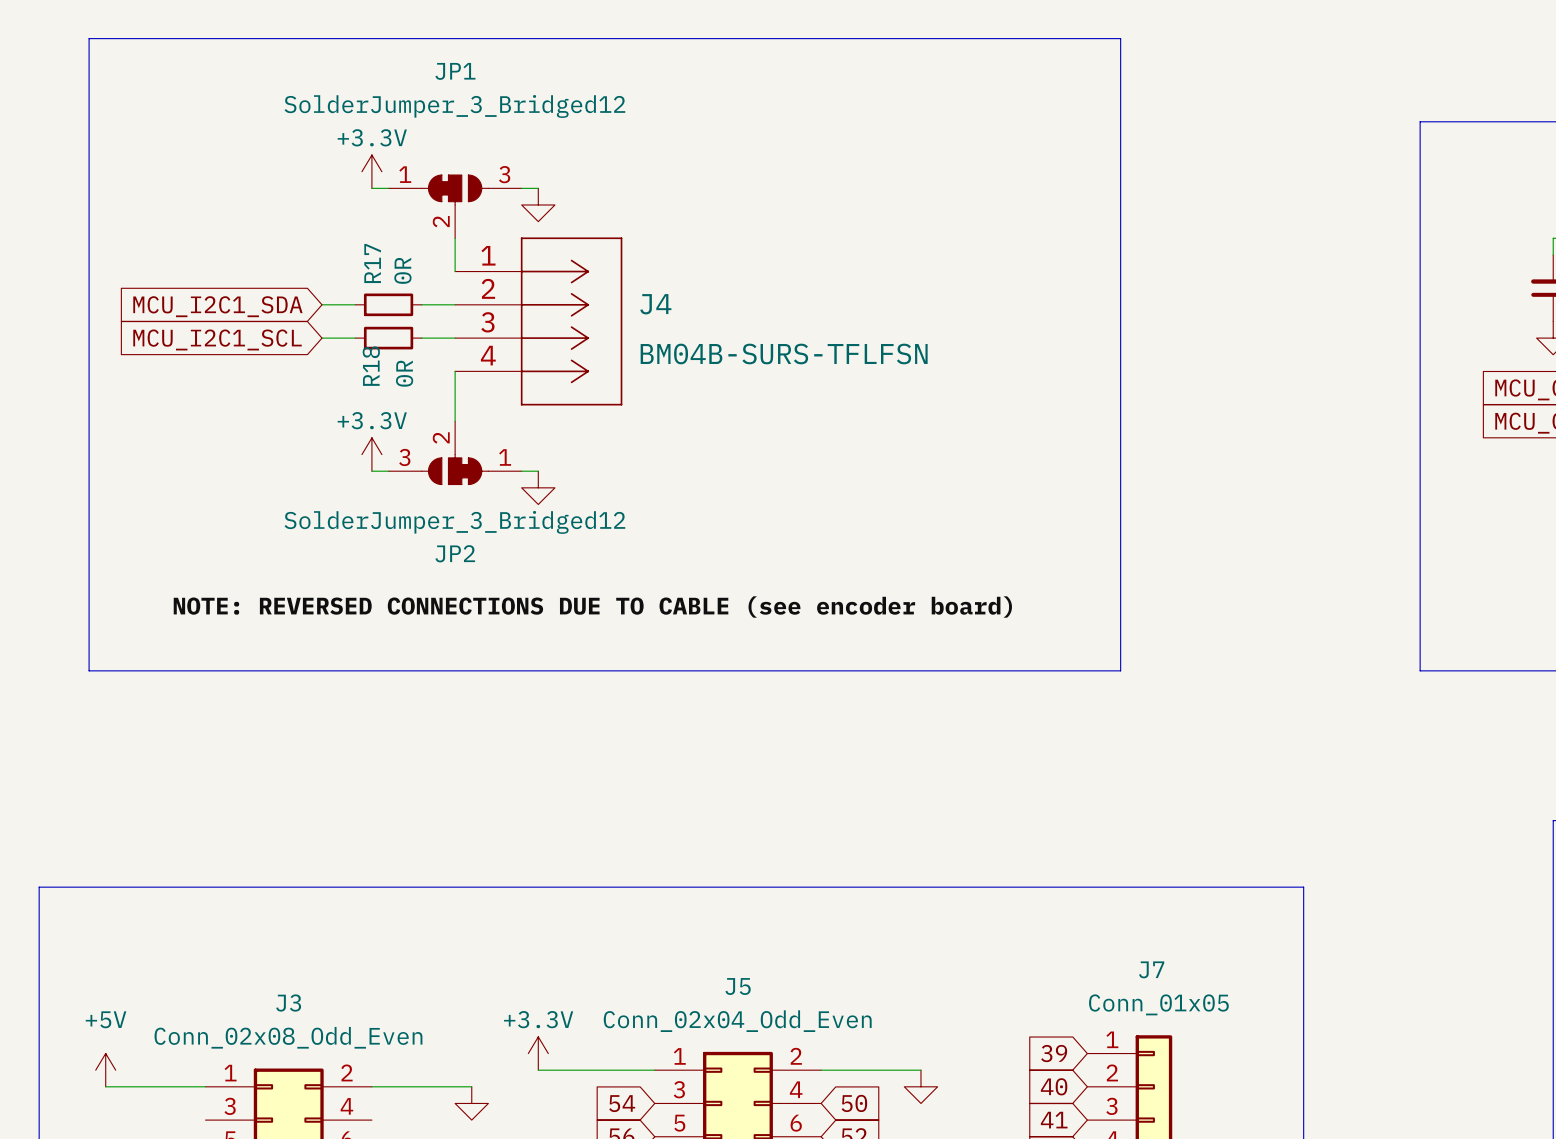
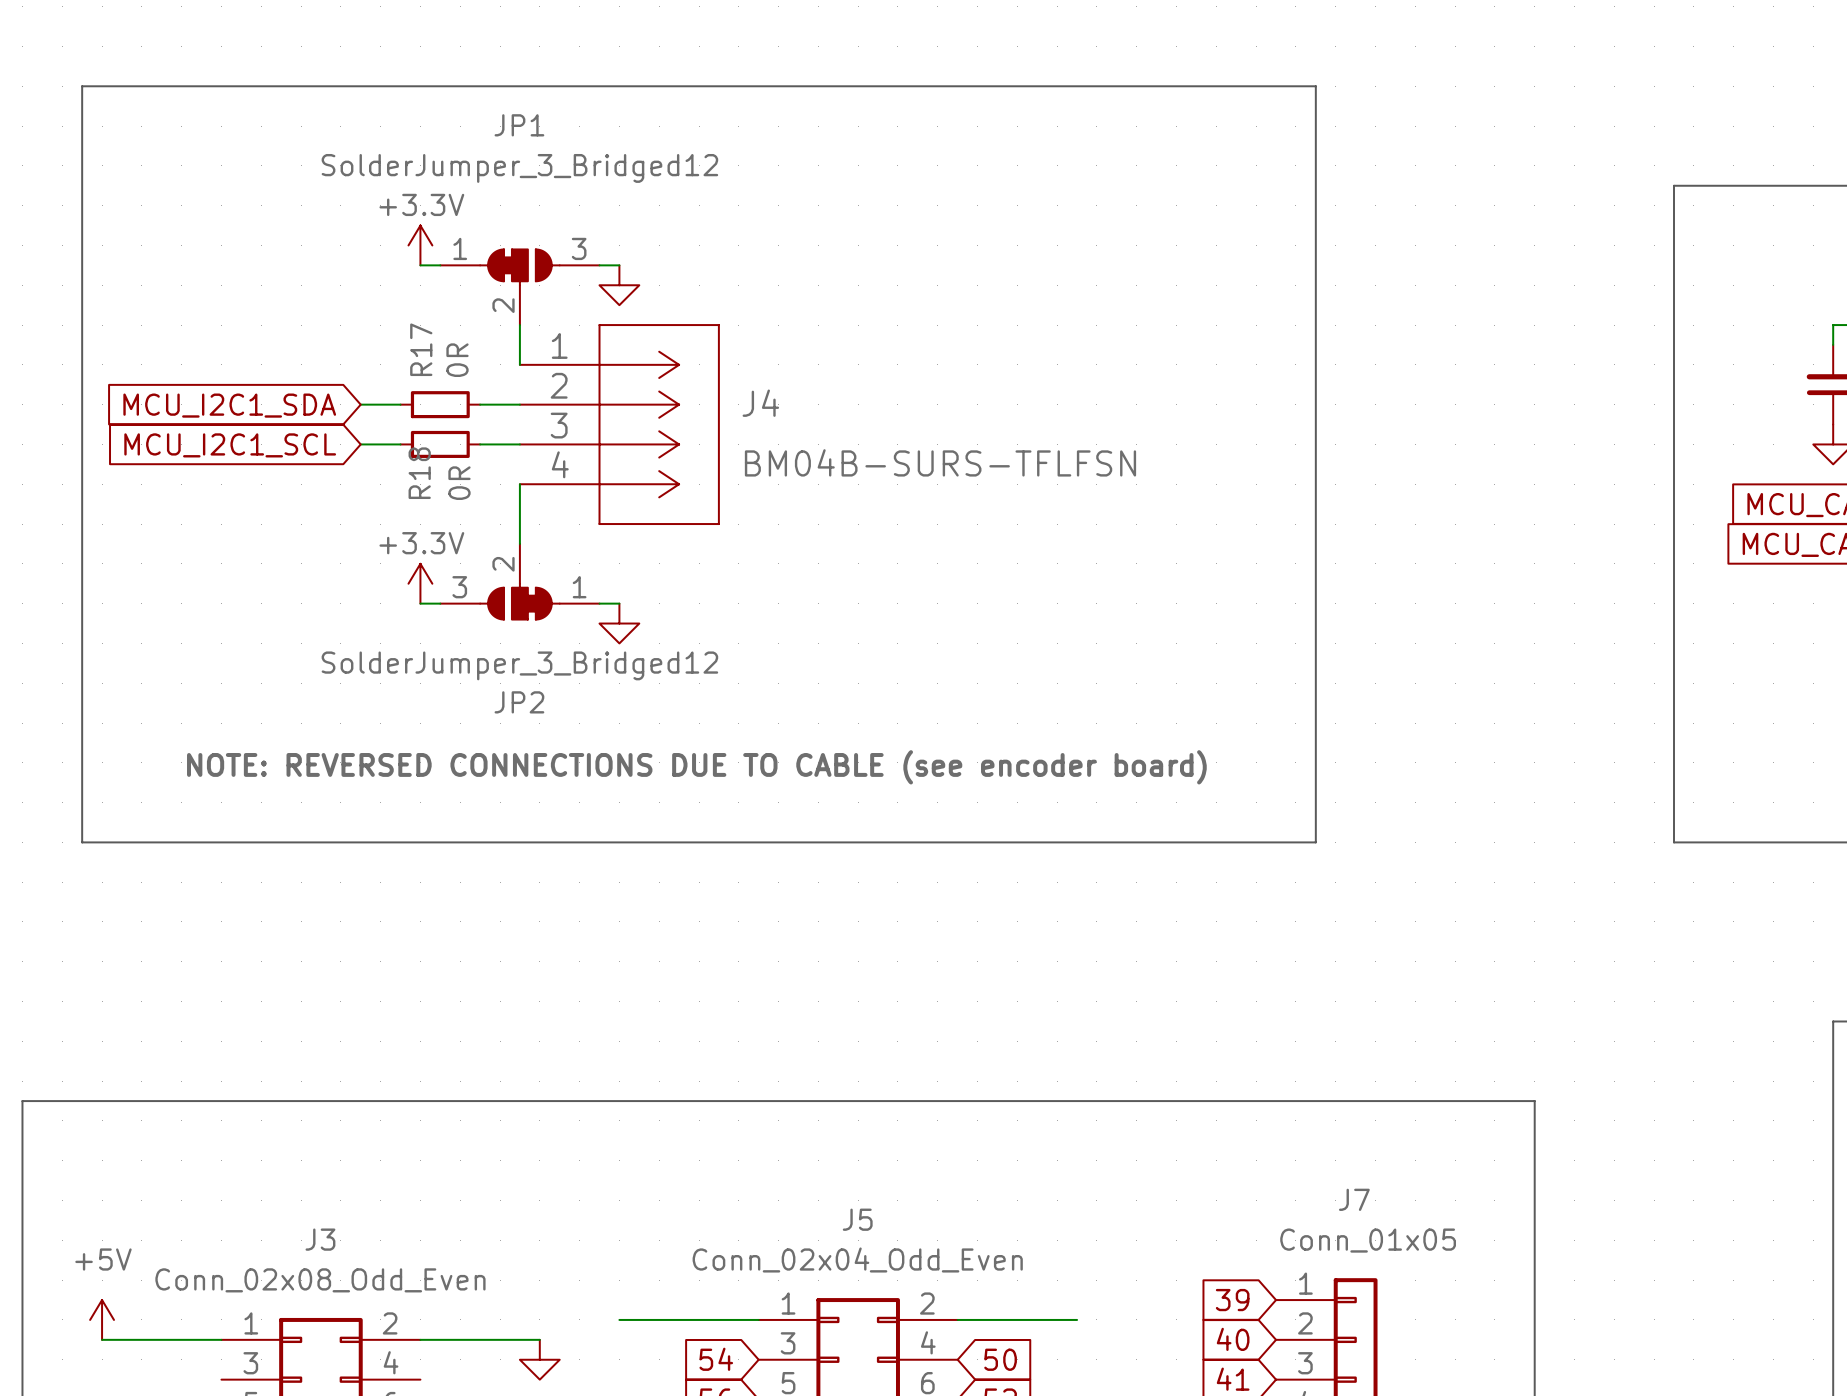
power symbol: +3.3V (538, 1053) -> none
power symbol: (920, 1086) -> none

